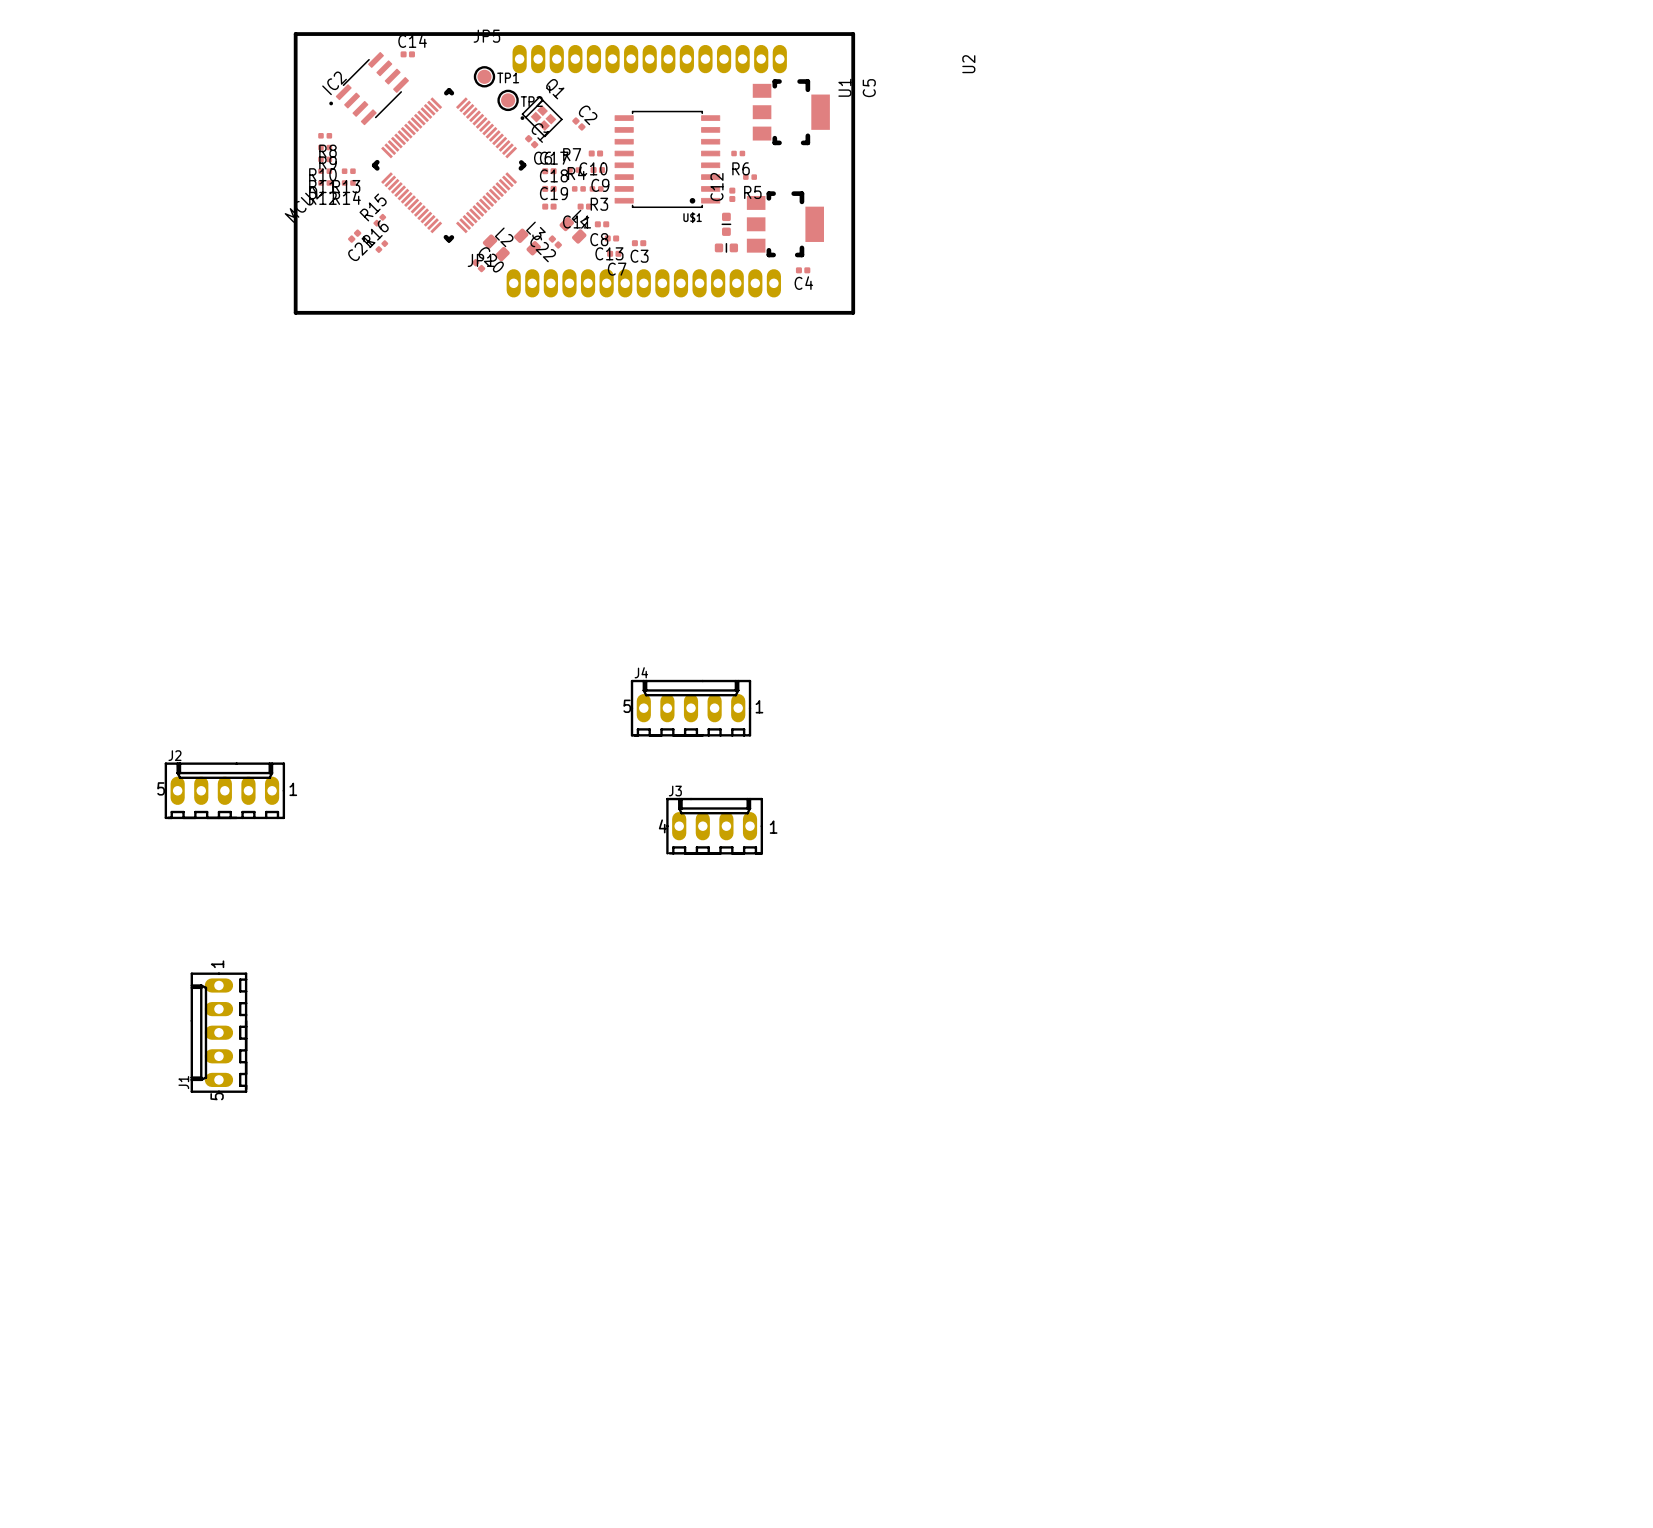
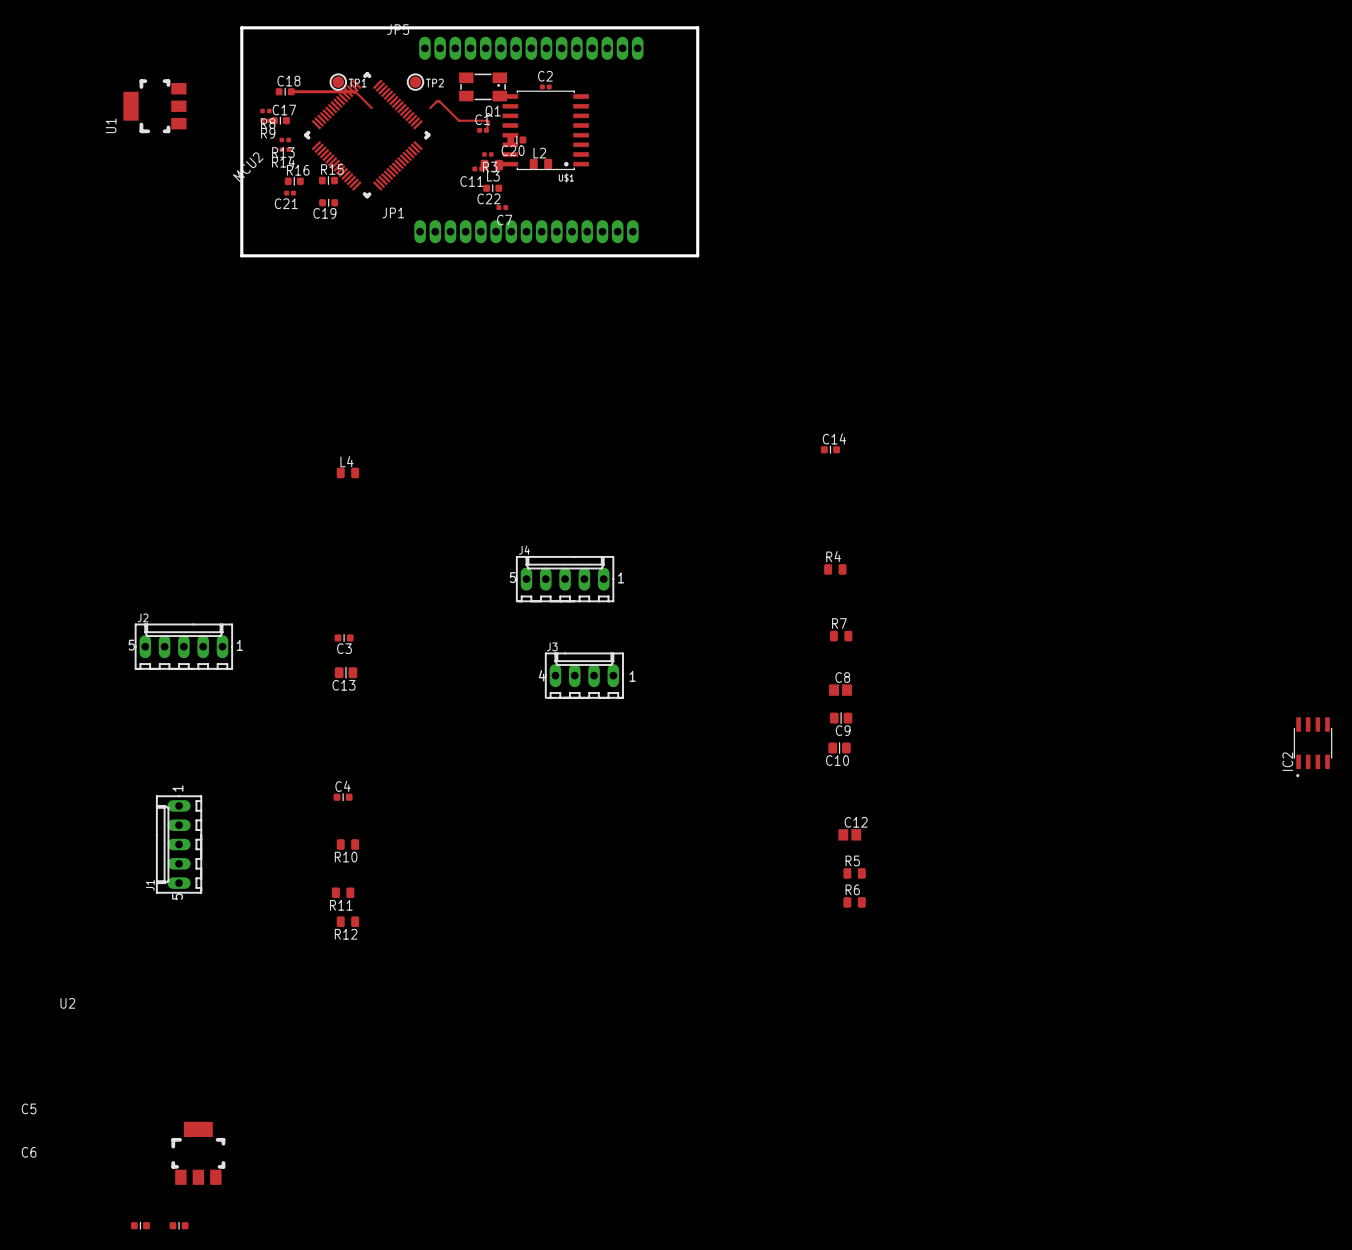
C14 footprint: [400, 51, 415, 58] -> [820, 445, 840, 454]
TP1 position: (484, 76) -> (338, 82)
IC2 rotation: 0° (369, 88) -> 45° counterclockwise (1313, 747)
IC2 position: (369, 88) -> (1313, 747)
C5 name position: C5 (869, 88) -> C5 (29, 1108)
Q1 name position: Q1 (555, 89) -> Q1 (493, 111)
Q1 footprint: [520, 96, 563, 138] -> [459, 72, 507, 102]
top track: none -> (291, 91) (355, 91) (371, 108)
U1 rotation: 0° (791, 112) -> 180° (154, 106)
U1 position: (791, 112) -> (154, 106)
C2 rotation: 0° (578, 123) -> 45° counterclockwise (545, 86)
C2 position: (578, 123) -> (545, 86)
top track: none -> (430, 108) (436, 101) (439, 101) (458, 120) (487, 120) (486, 130)
C1 rotation: 0° (531, 141) -> 45° counterclockwise (483, 130)
C1 position: (531, 141) -> (483, 130)
C10 footprint: [588, 150, 604, 157] -> [828, 742, 851, 754]
R6 footprint: [731, 150, 746, 157] -> [843, 897, 866, 908]
R10 footprint: [318, 156, 333, 163] -> [336, 839, 360, 850]
R7 footprint: [567, 167, 582, 173] -> [829, 630, 853, 642]
C9 footprint: [590, 167, 605, 174] -> [829, 712, 853, 724]
R11 footprint: [318, 168, 333, 174] -> [331, 887, 355, 899]
C17 footprint: [542, 168, 557, 175] -> [270, 116, 290, 125]
R6 name position: R6 (741, 168) -> R6 (852, 889)
R5 footprint: [743, 174, 757, 180] -> [843, 868, 866, 879]
R12 footprint: [318, 180, 333, 186] -> [336, 916, 360, 928]
C18 footprint: [542, 185, 557, 192] -> [275, 87, 295, 96]
R4 footprint: [571, 186, 586, 192] -> [824, 564, 847, 575]
C12 name position: C12 (716, 187) -> C12 (856, 822)
C12 footprint: [729, 187, 736, 203] -> [838, 829, 862, 841]
R5 name position: R5 (752, 192) -> R5 (852, 860)
C19 name position: C19 (553, 193) -> C19 (324, 213)
C19 footprint: [542, 203, 557, 210] -> [319, 198, 339, 207]
R15 footprint: [373, 213, 387, 227] -> [318, 176, 338, 185]
C8 footprint: [594, 221, 610, 228] -> [829, 684, 852, 696]
C5 rotation: 0° (726, 224) -> 90° clockwise (140, 1225)
C5 position: (726, 224) -> (140, 1225)
U2 rotation: 0° (785, 224) -> 90° counterclockwise (198, 1153)
U2 position: (785, 224) -> (198, 1153)
L3 name position: L3 (535, 230) -> L3 (493, 176)
L4 rotation: 0° (573, 230) -> 45° counterclockwise (347, 472)
L4 position: (573, 230) -> (347, 472)
C22 footprint: [548, 235, 563, 249] -> [483, 184, 503, 193]
C13 footprint: [604, 235, 620, 242] -> [334, 666, 358, 679]
C21 rotation: 0° (354, 236) -> 45° clockwise (290, 193)
C8 name position: C8 (599, 239) -> C8 (842, 677)
R16 footprint: [375, 240, 389, 254] -> [284, 177, 304, 186]
C3 footprint: [631, 240, 647, 247] -> [334, 634, 354, 642]
L3 rotation: 0° (527, 242) -> 45° counterclockwise (491, 165)
L3 position: (527, 242) -> (491, 165)
L2 rotation: 0° (496, 247) -> 45° counterclockwise (540, 164)
L2 position: (496, 247) -> (540, 164)
C6 position: (726, 247) -> (179, 1225)
C20 footprint: [471, 258, 486, 273] -> [507, 136, 527, 144]
C20 name position: C20 (491, 259) -> C20 (513, 150)
C4 footprint: [795, 267, 811, 274] -> [333, 793, 353, 802]
C4 name position: C4 (803, 283) -> C4 (342, 786)

